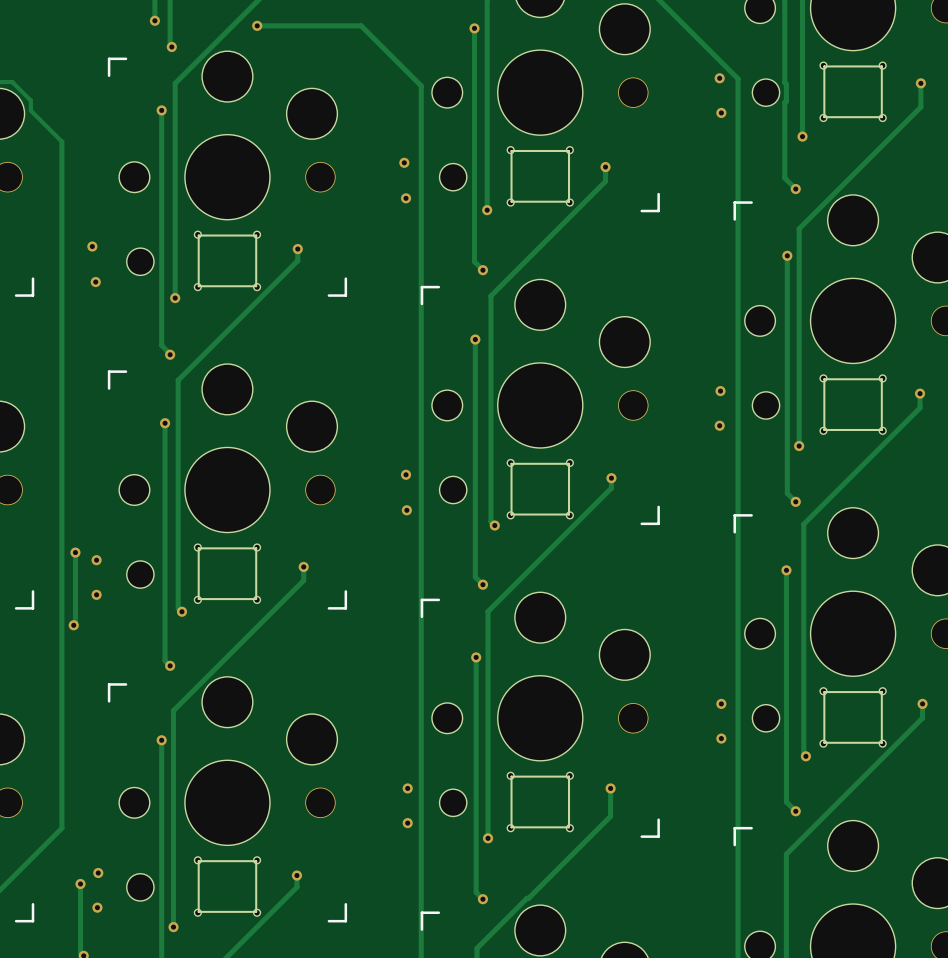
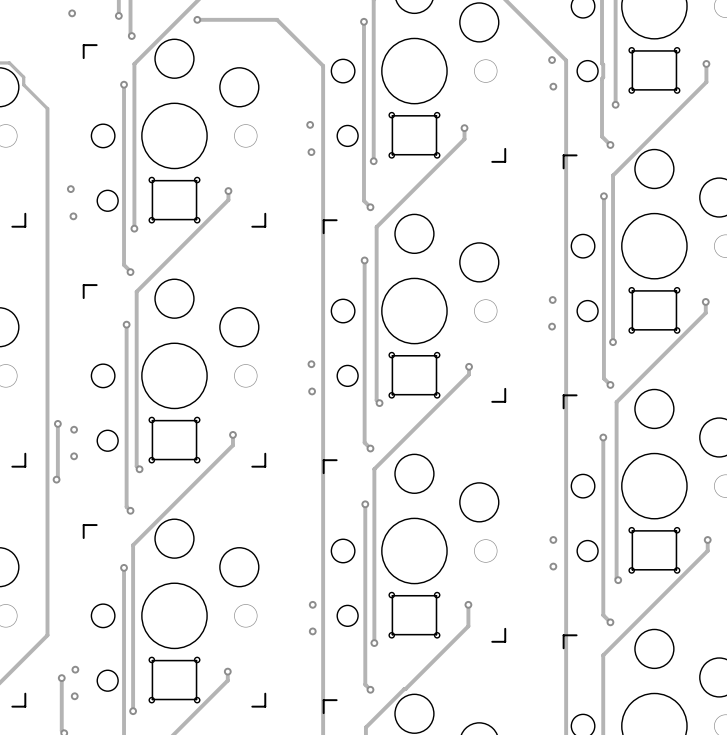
via: none -> (72, 13)

